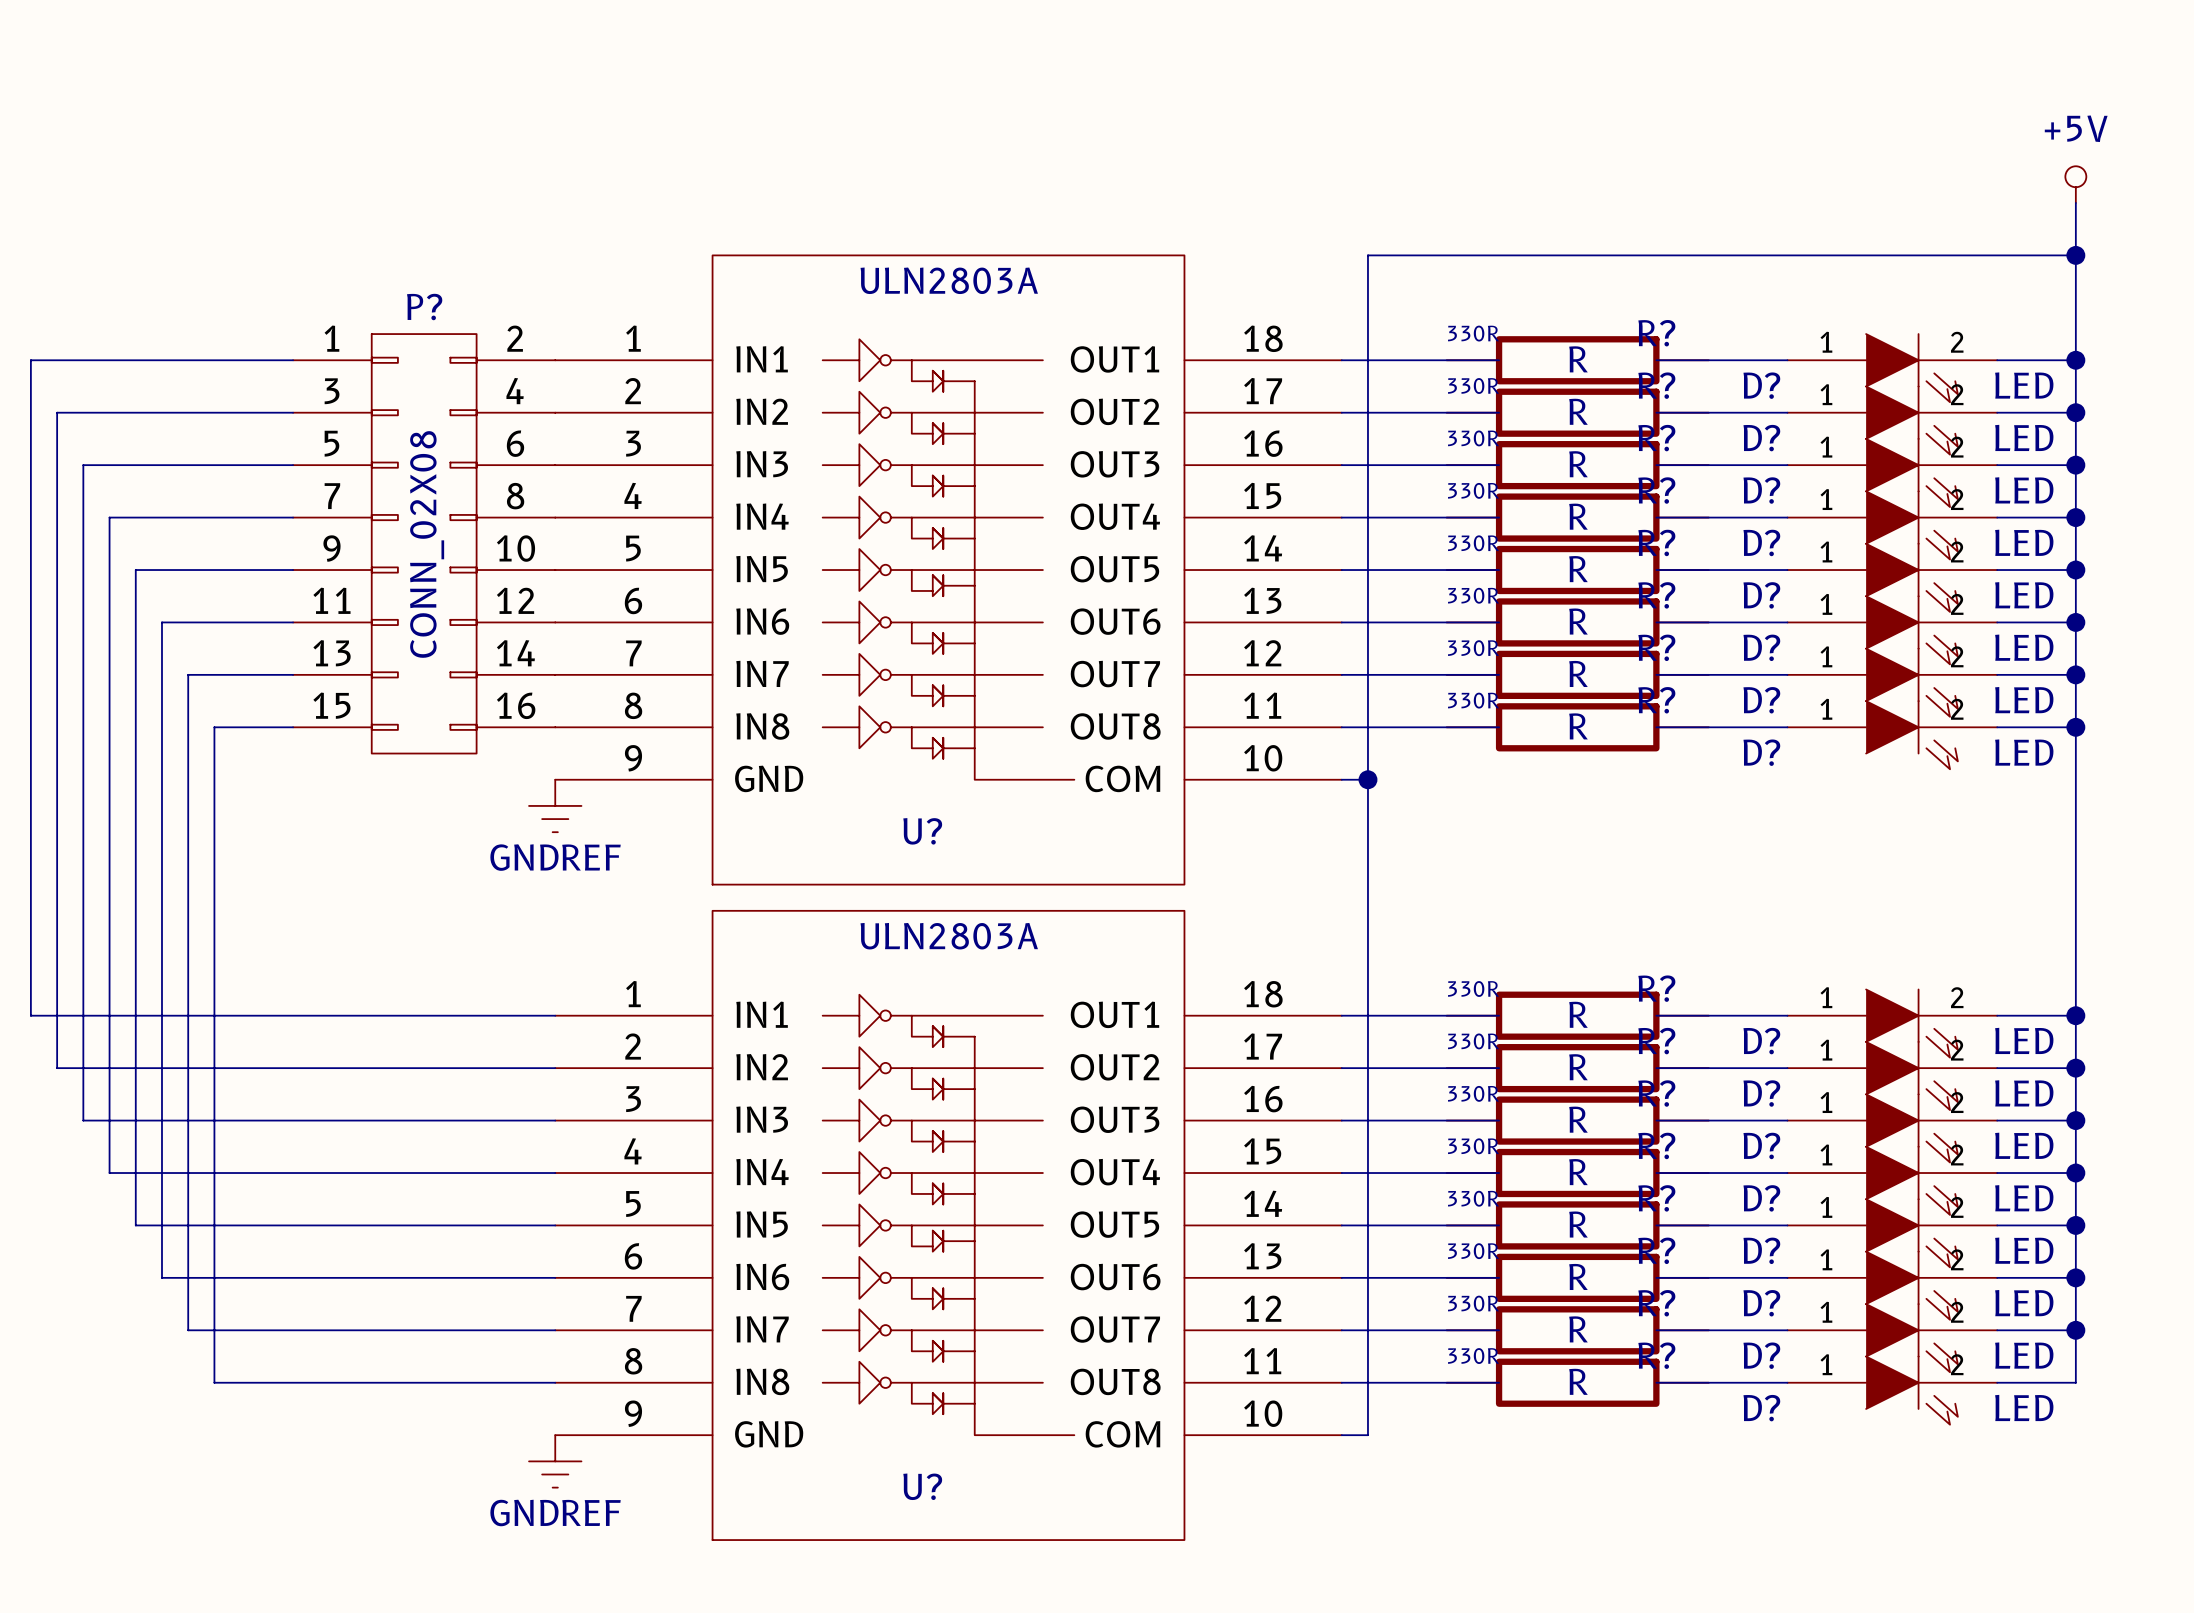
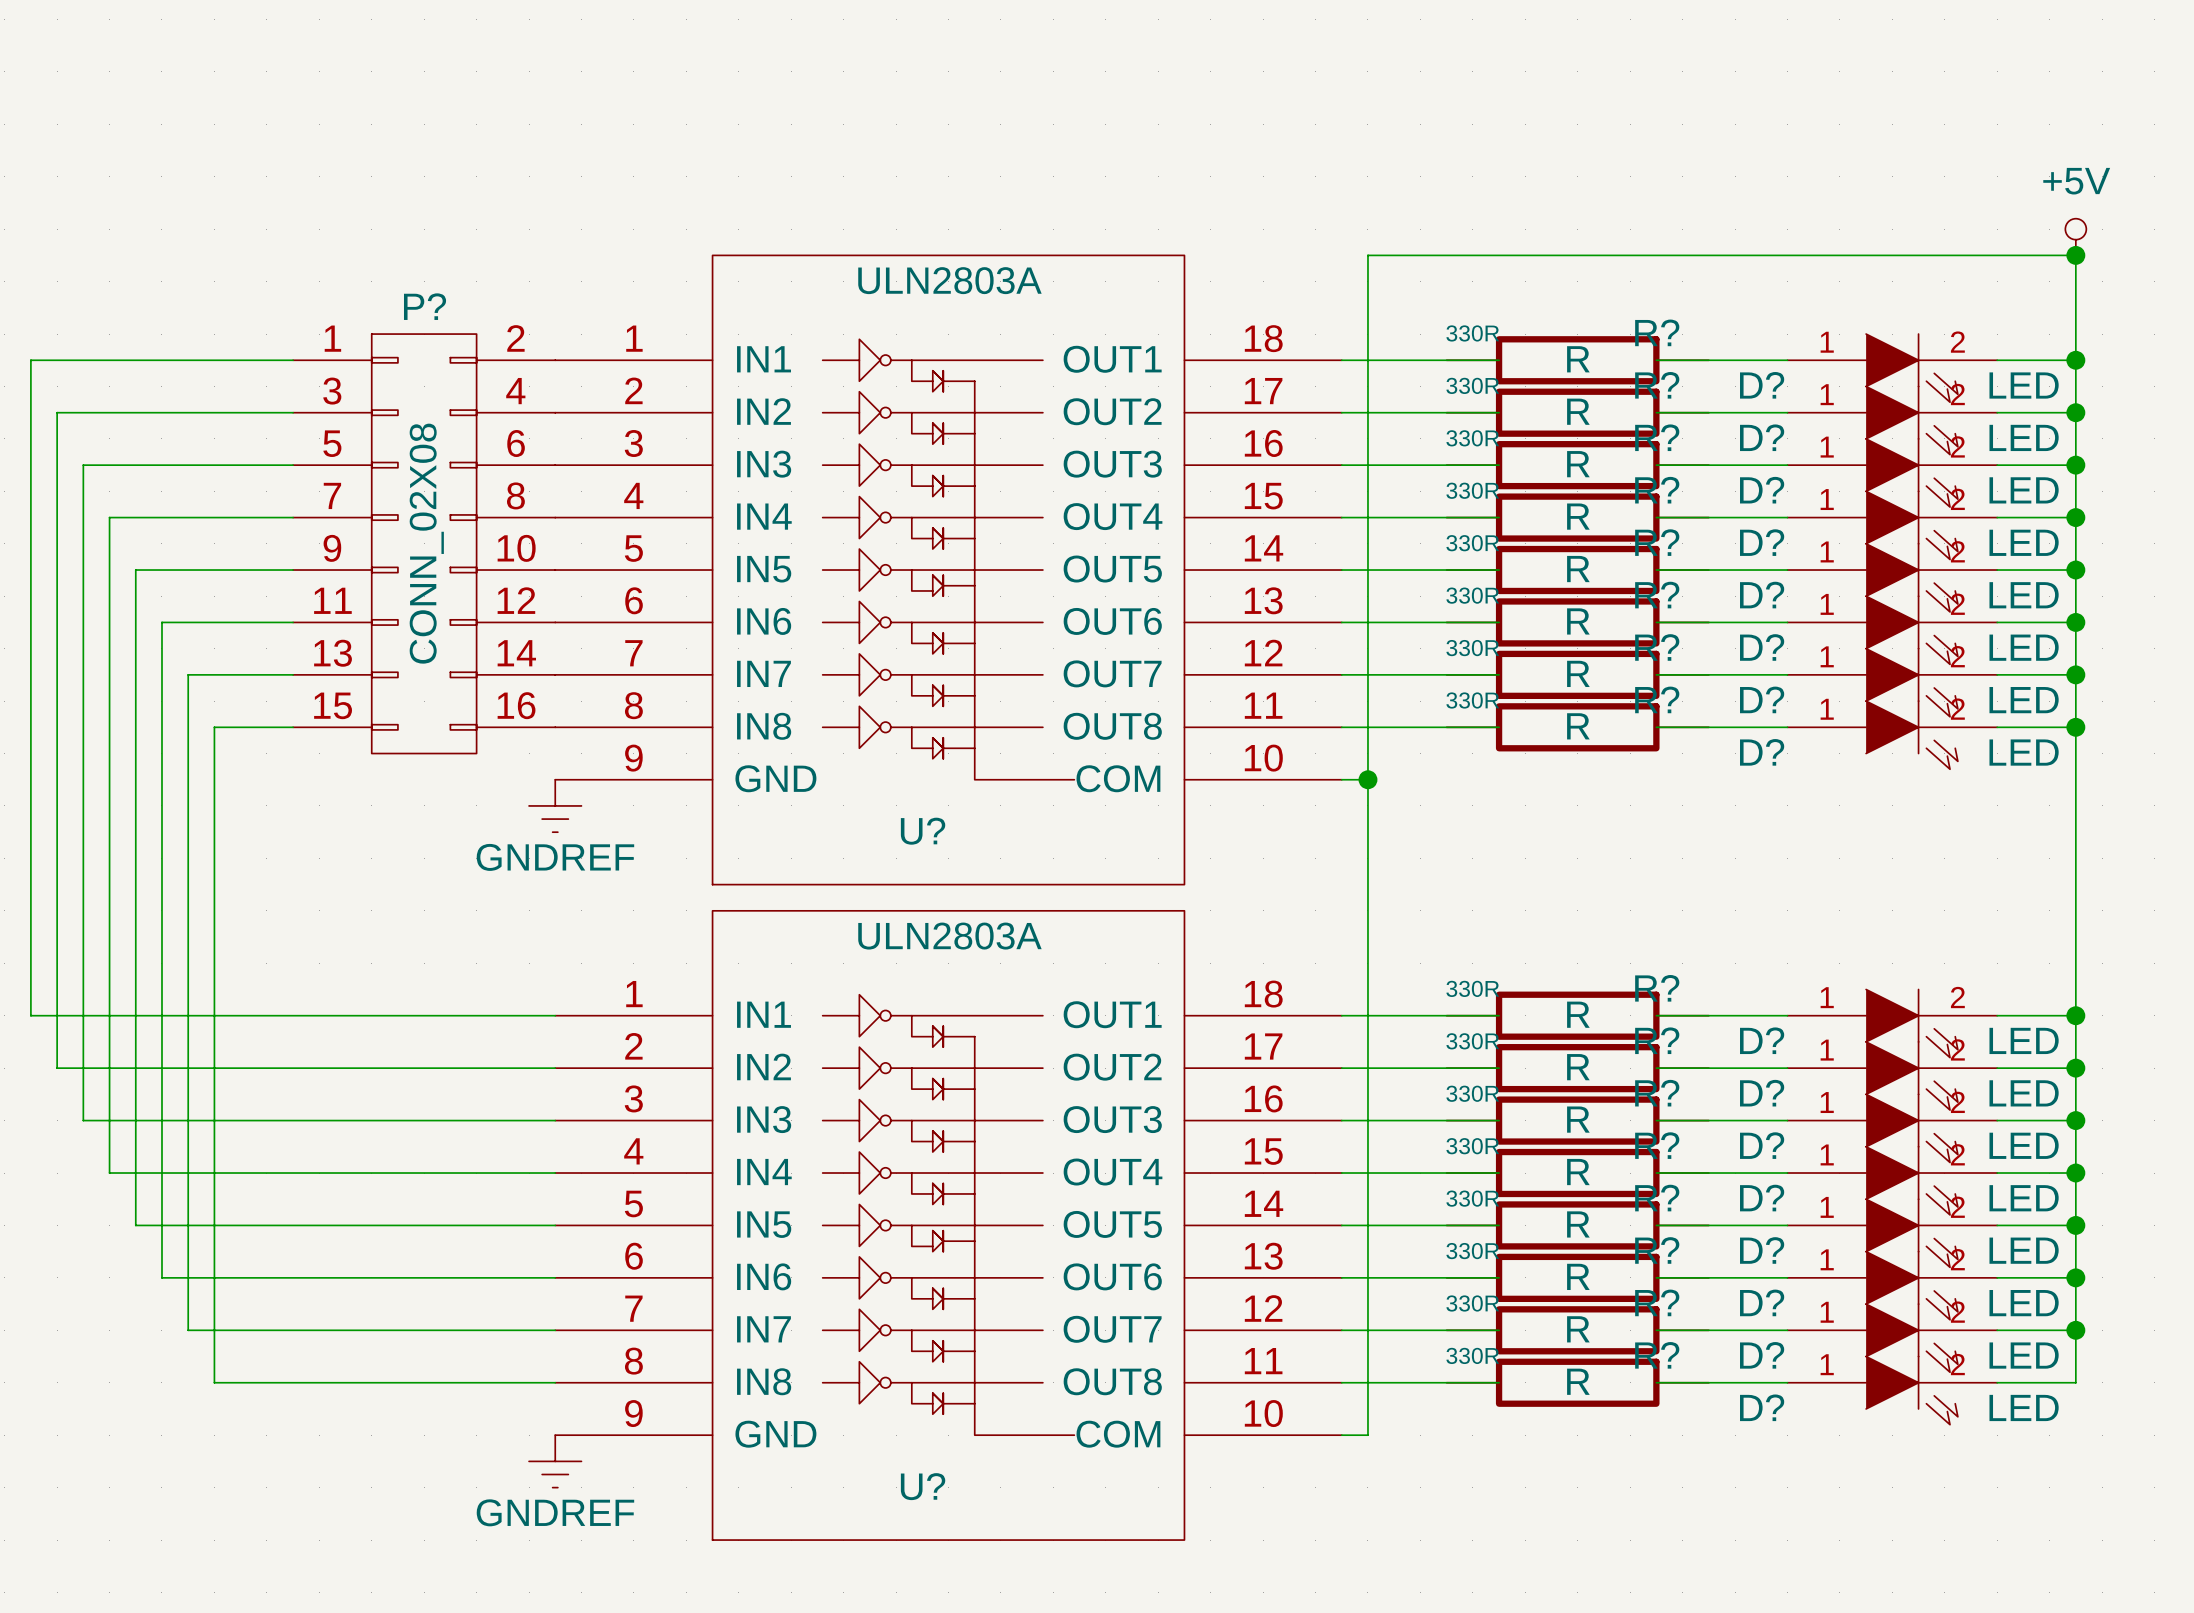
power symbol position: +5V (2075, 184) -> +5V (2075, 237)
wire: (2075, 202) (2075, 255) -> none

